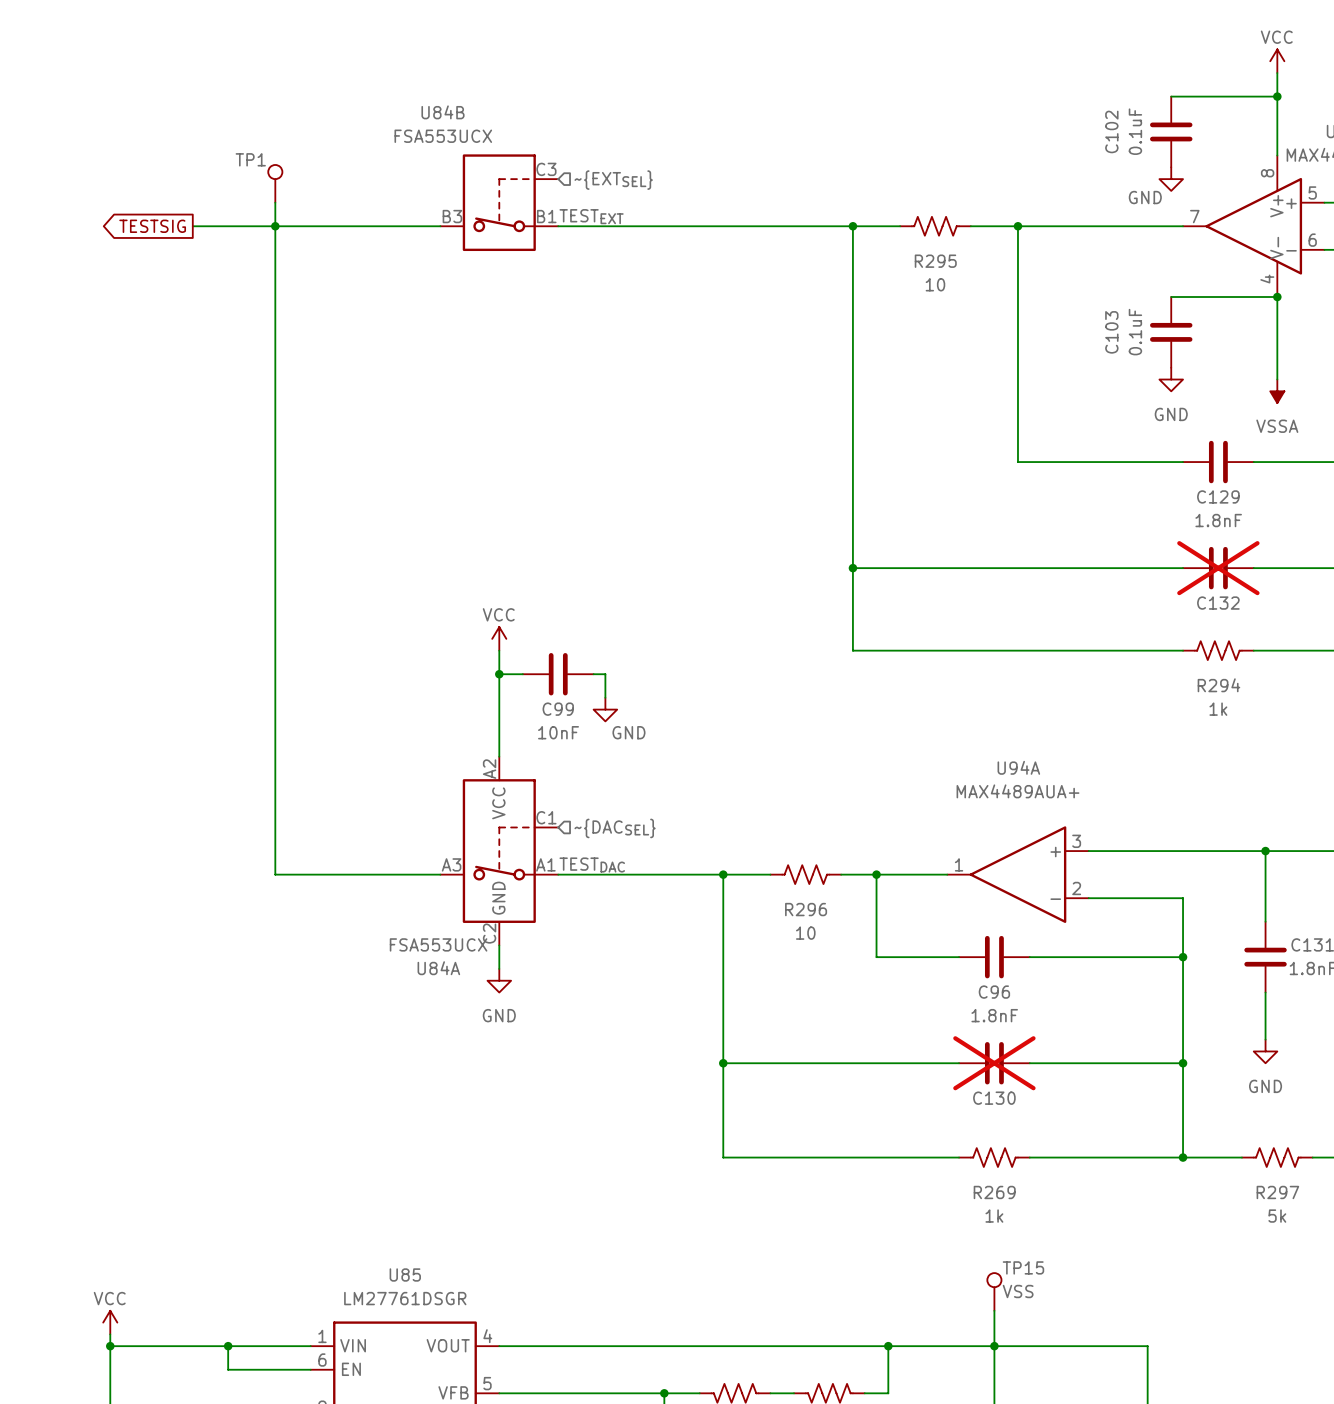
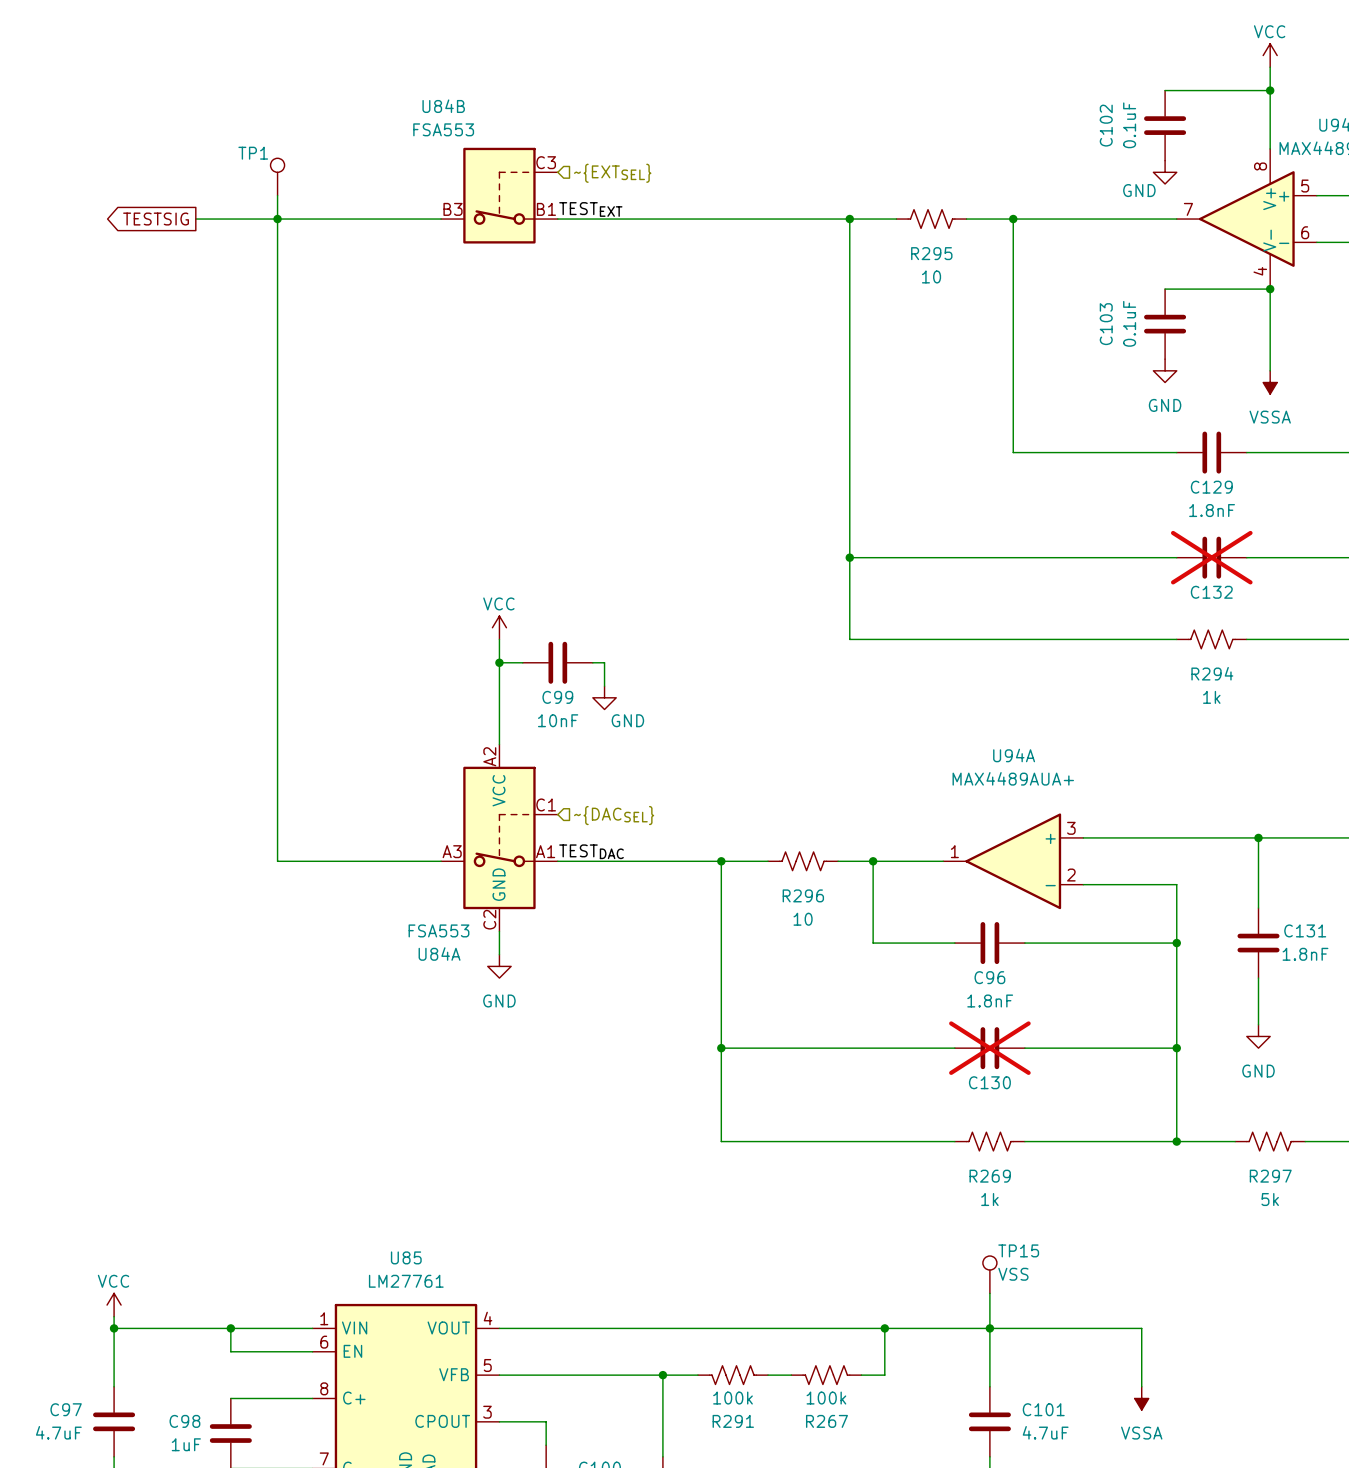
U84B value: FSA553UCX (443, 136) -> FSA553 (443, 129)
U84A value: FSA553UCX (438, 944) -> FSA553 (438, 930)
U85 value: LM27761DSGR (405, 1298) -> LM27761 (406, 1281)

